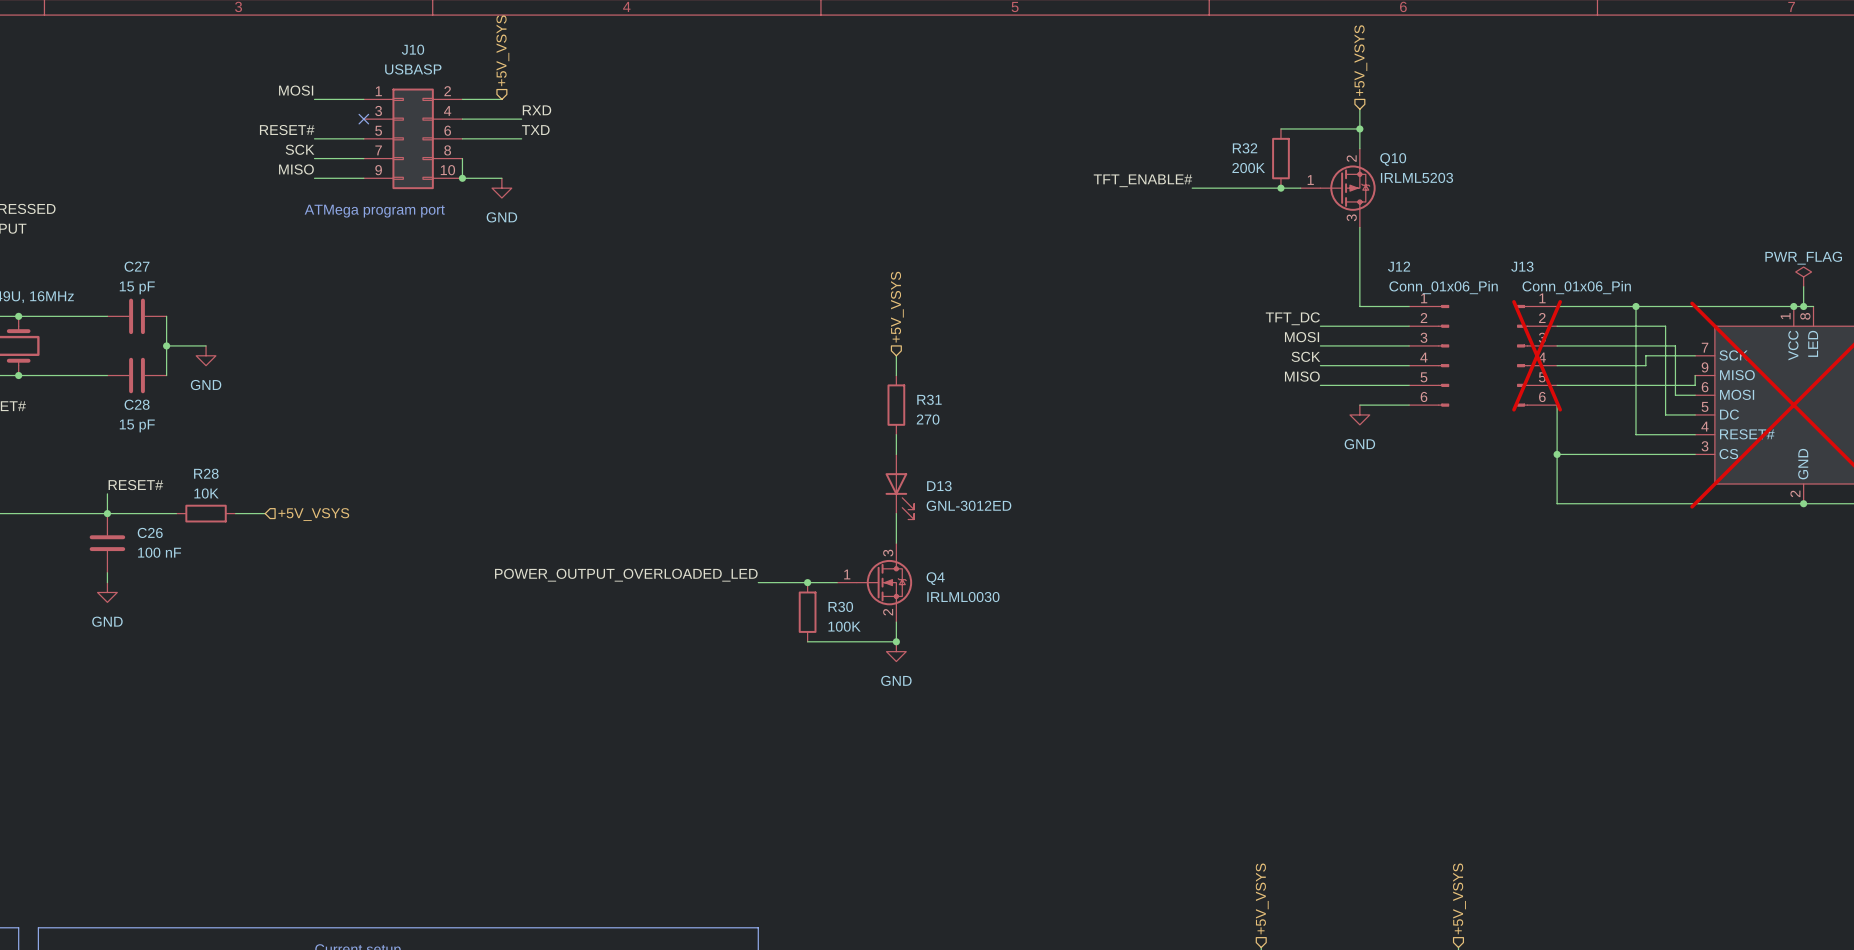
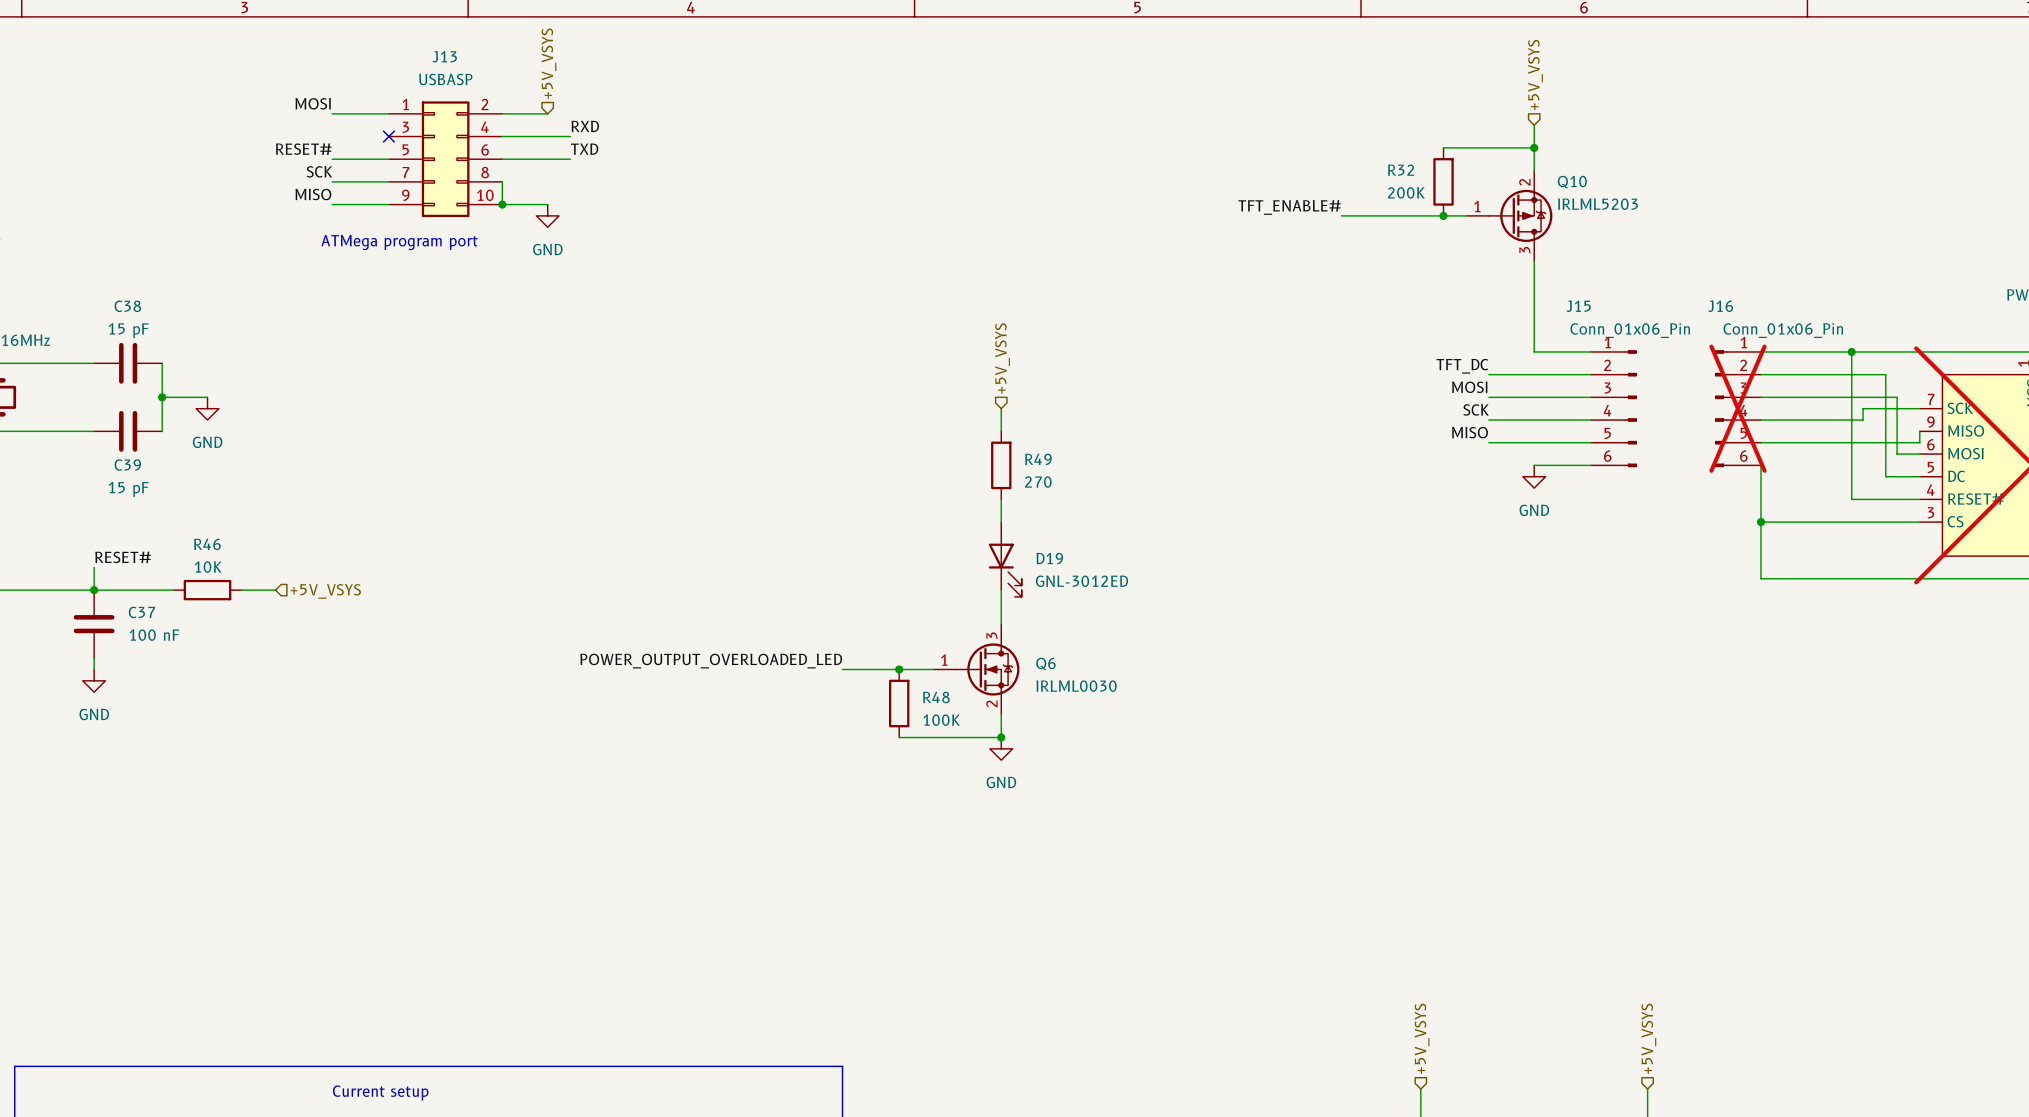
J10 name: J10 (412, 49) -> J13 (444, 56)
C27 name: C27 (137, 266) -> C38 (127, 306)
J12 name: J12 (1399, 266) -> J15 (1578, 306)
J13 name: J13 (1522, 266) -> J16 (1720, 306)
R31 name: R31 (929, 399) -> R49 (1038, 459)
C28 name: C28 (137, 404) -> C39 (127, 465)
R28 name: R28 (206, 473) -> R46 (207, 544)
D13 name: D13 (939, 486) -> D19 (1049, 558)
C26 name: C26 (150, 532) -> C37 (141, 612)
Q4 name: Q4 (935, 578) -> Q6 (1045, 663)
R30 name: R30 (840, 606) -> R48 (936, 697)

